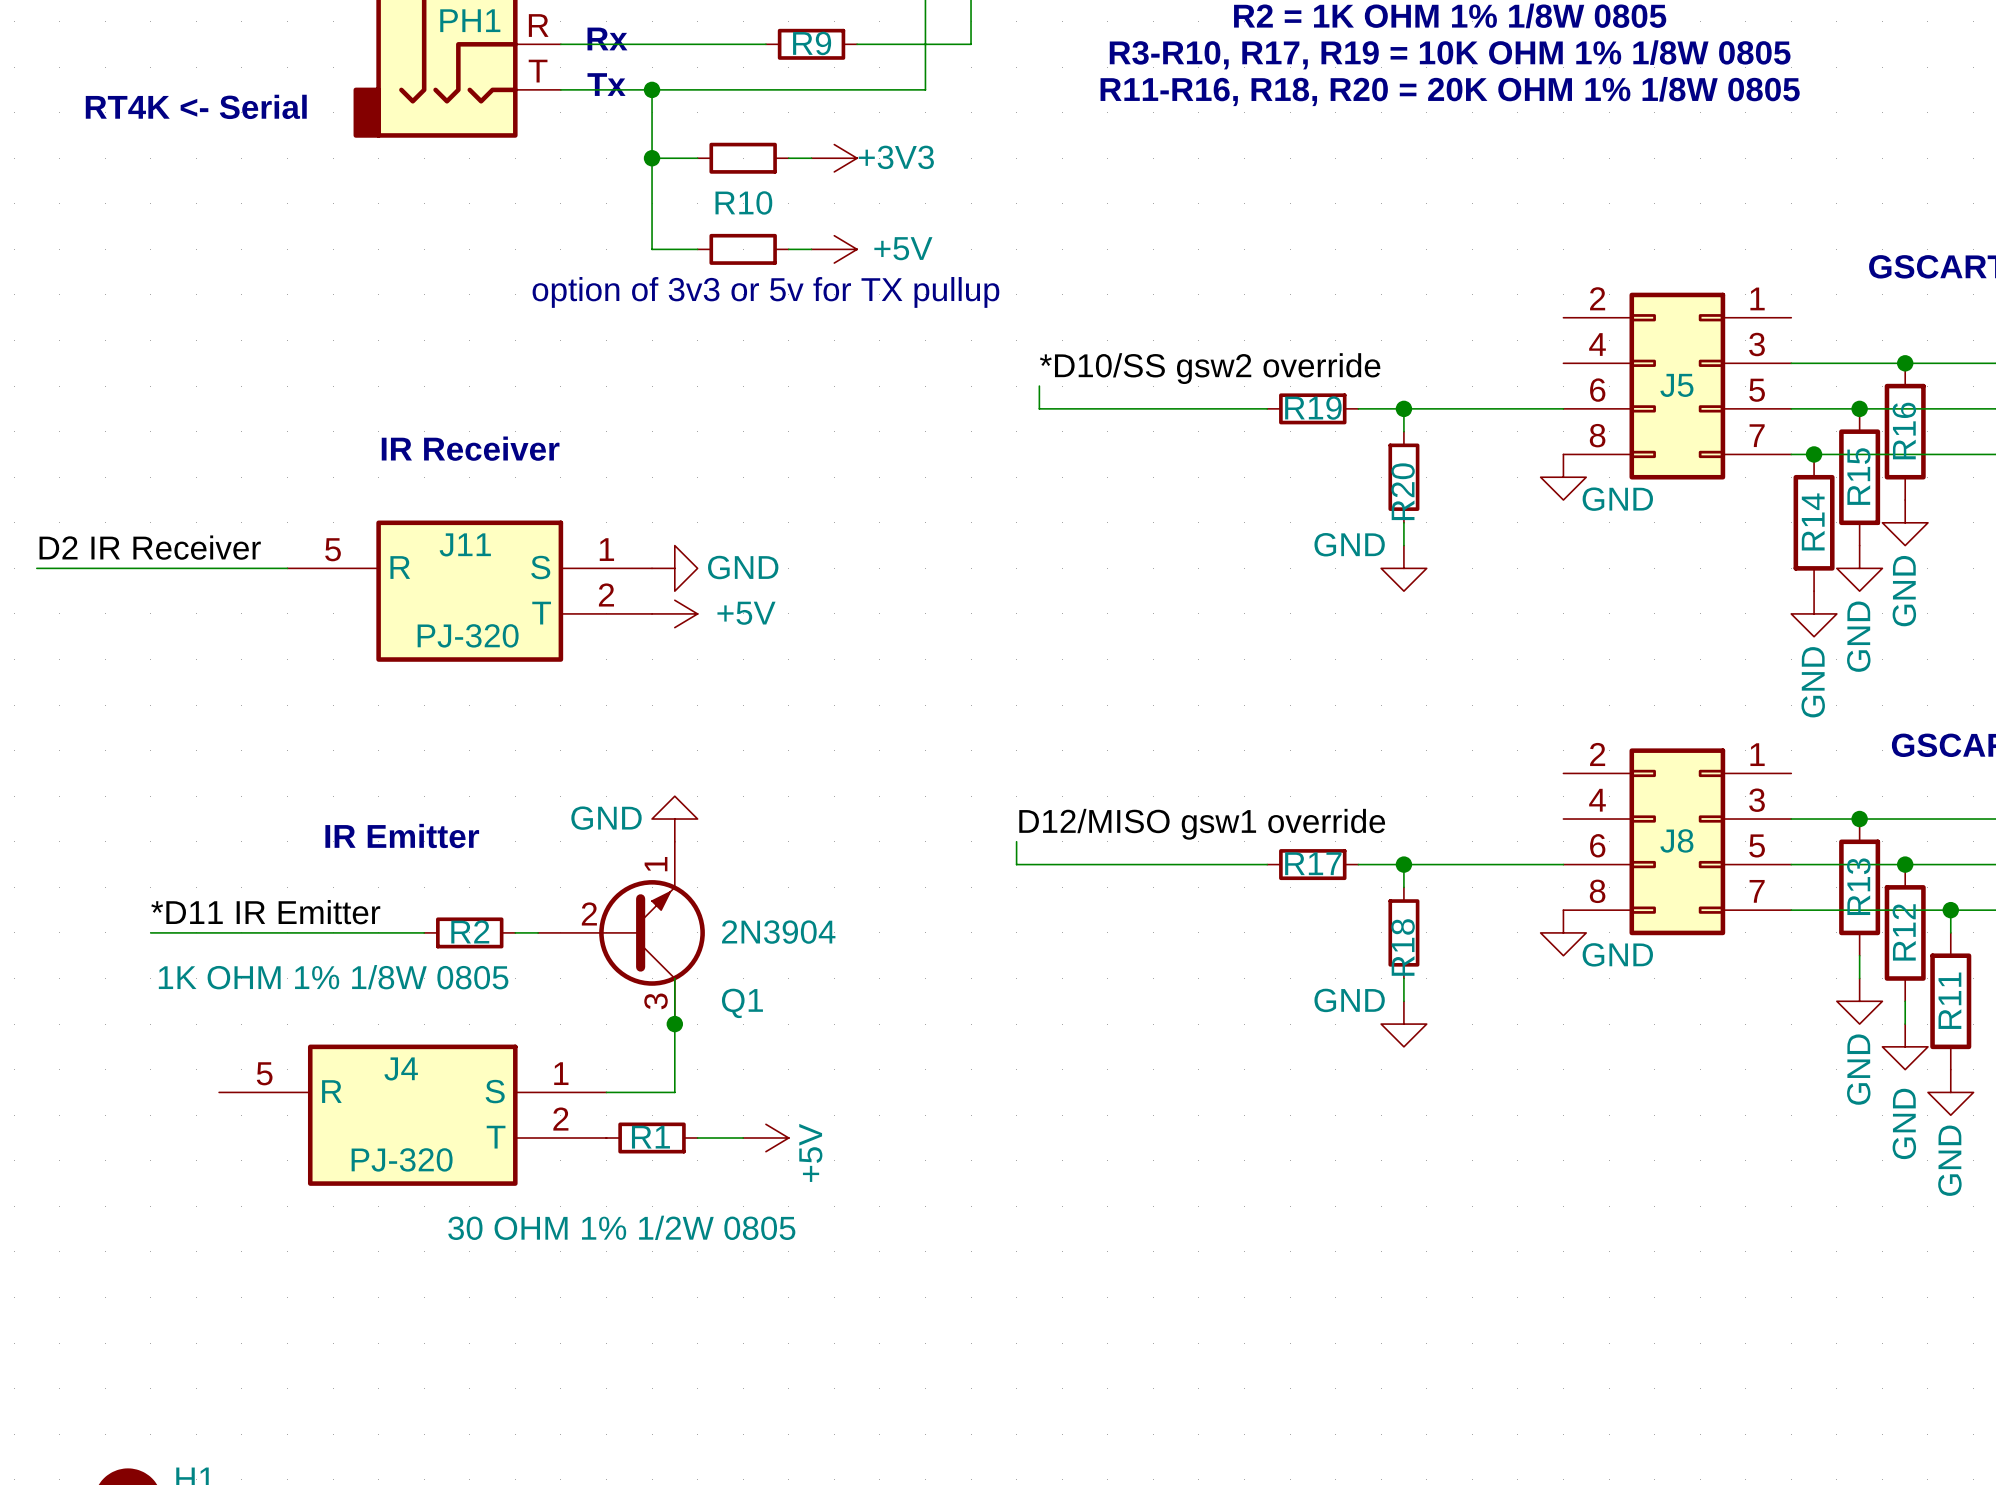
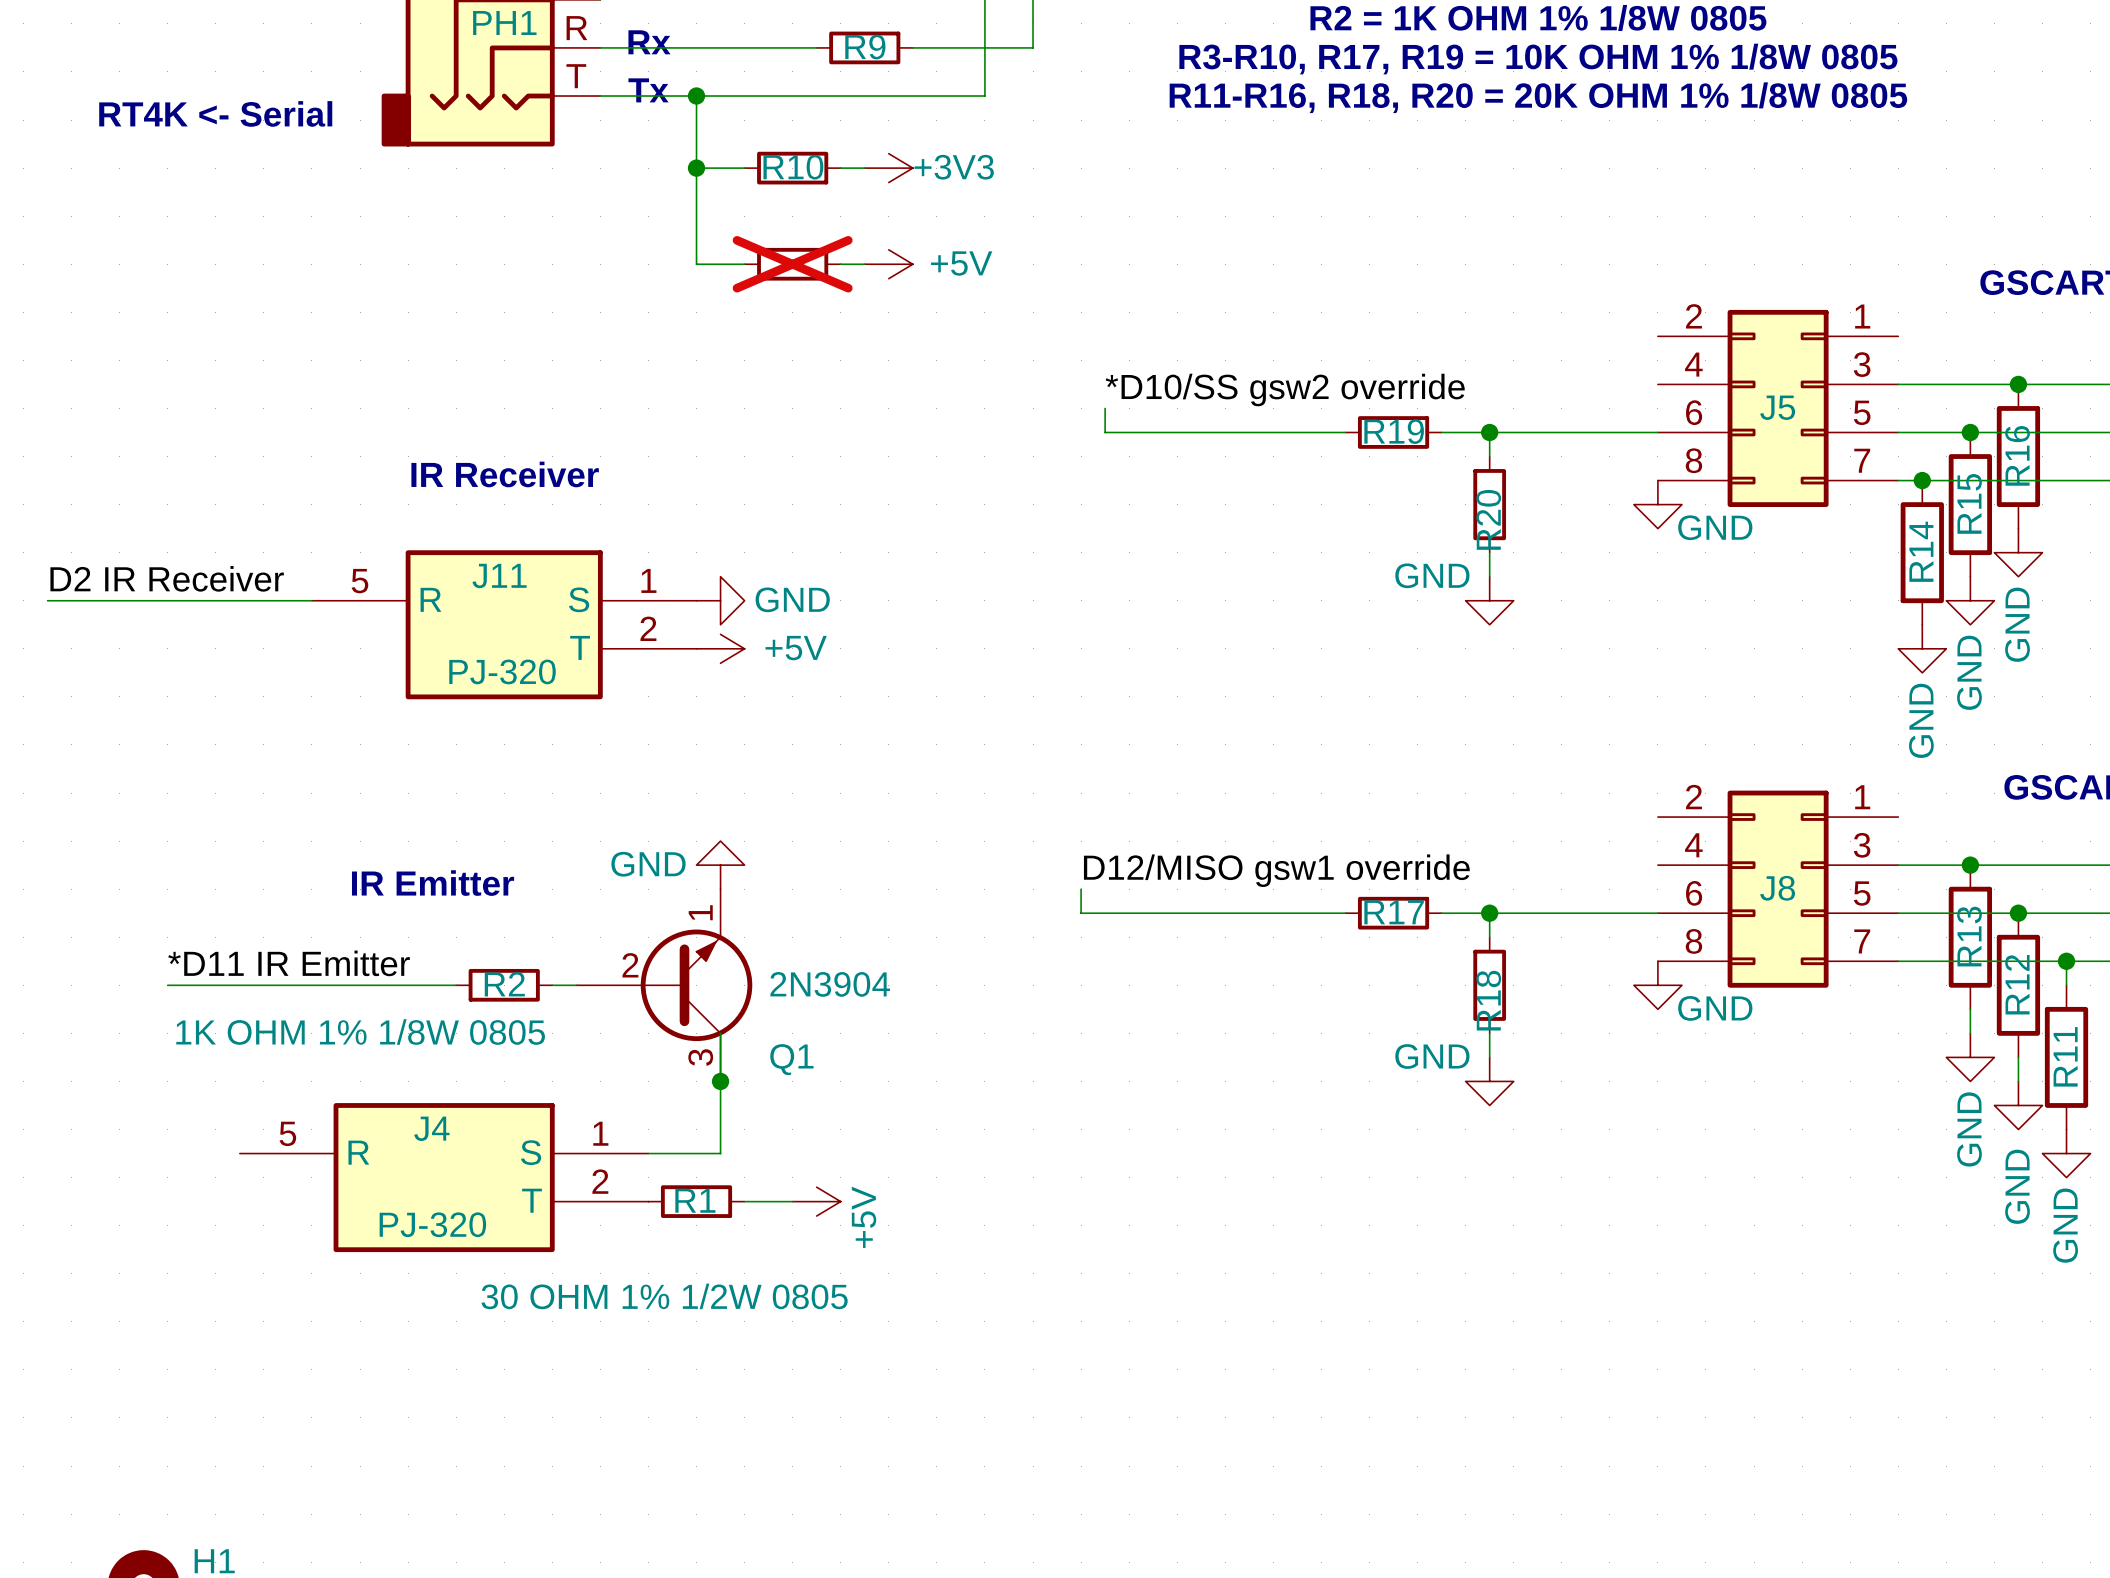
R10 name position: R10 (743, 202) -> R10 (793, 167)
part do-not-place cross: none -> (792, 264)
text: option of 3v3 or 5v for TX pullup (765, 292) -> none

